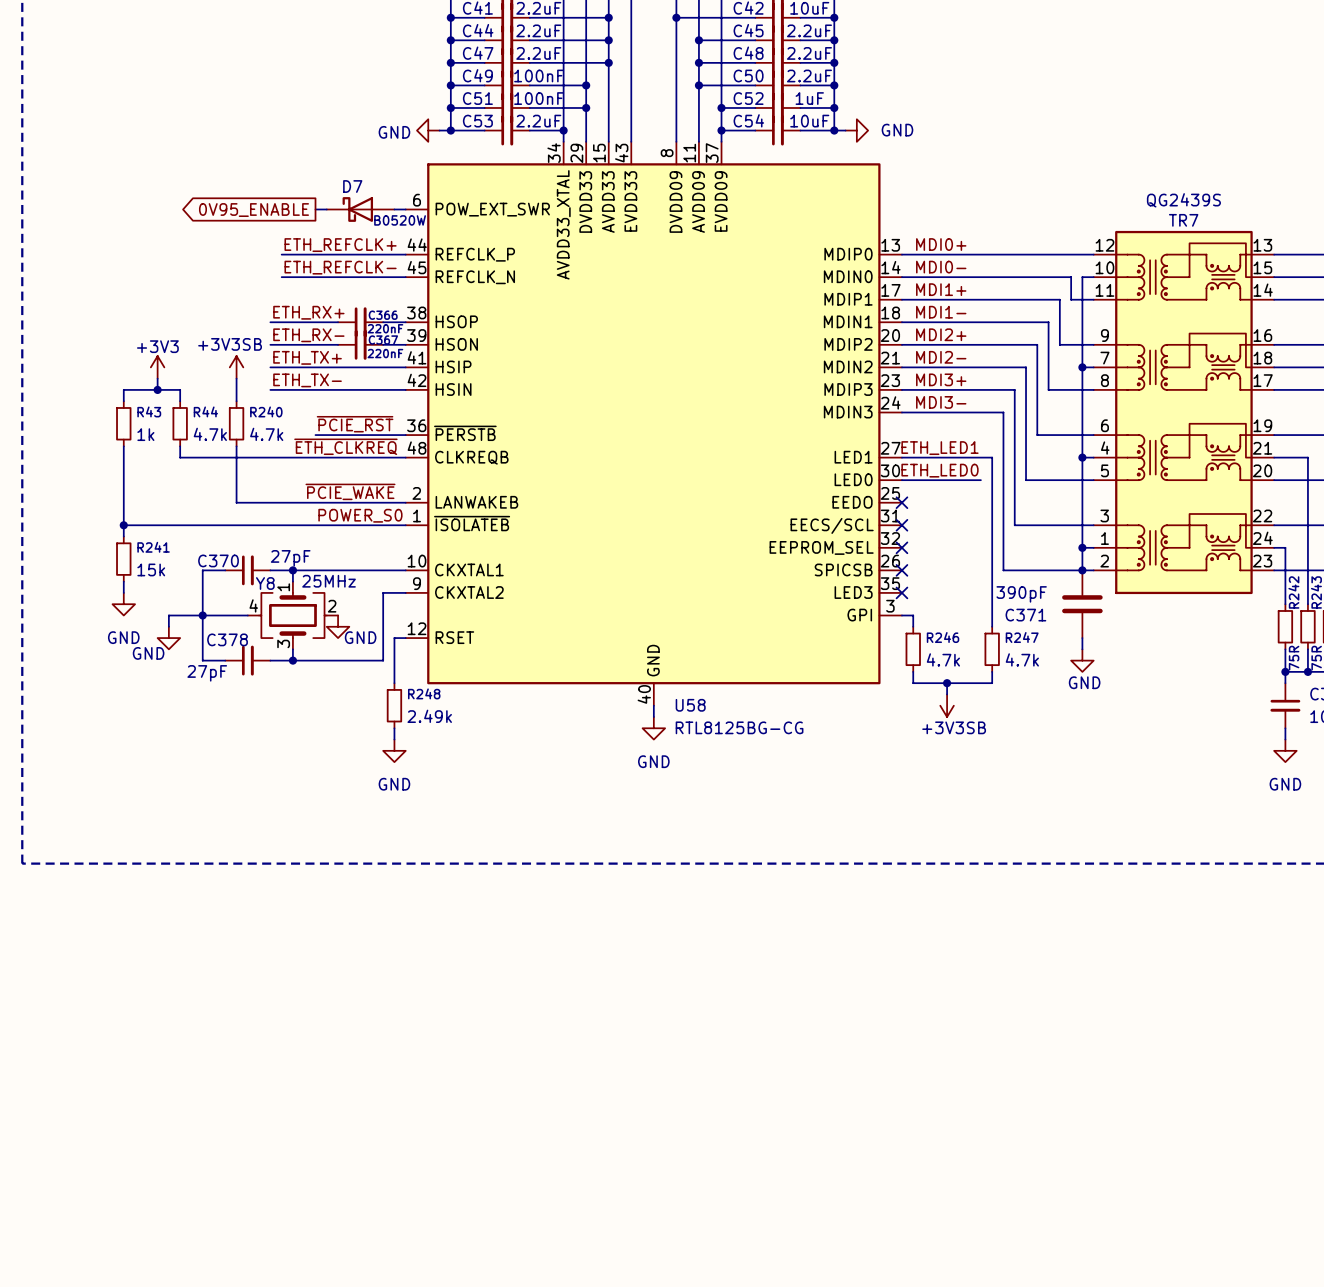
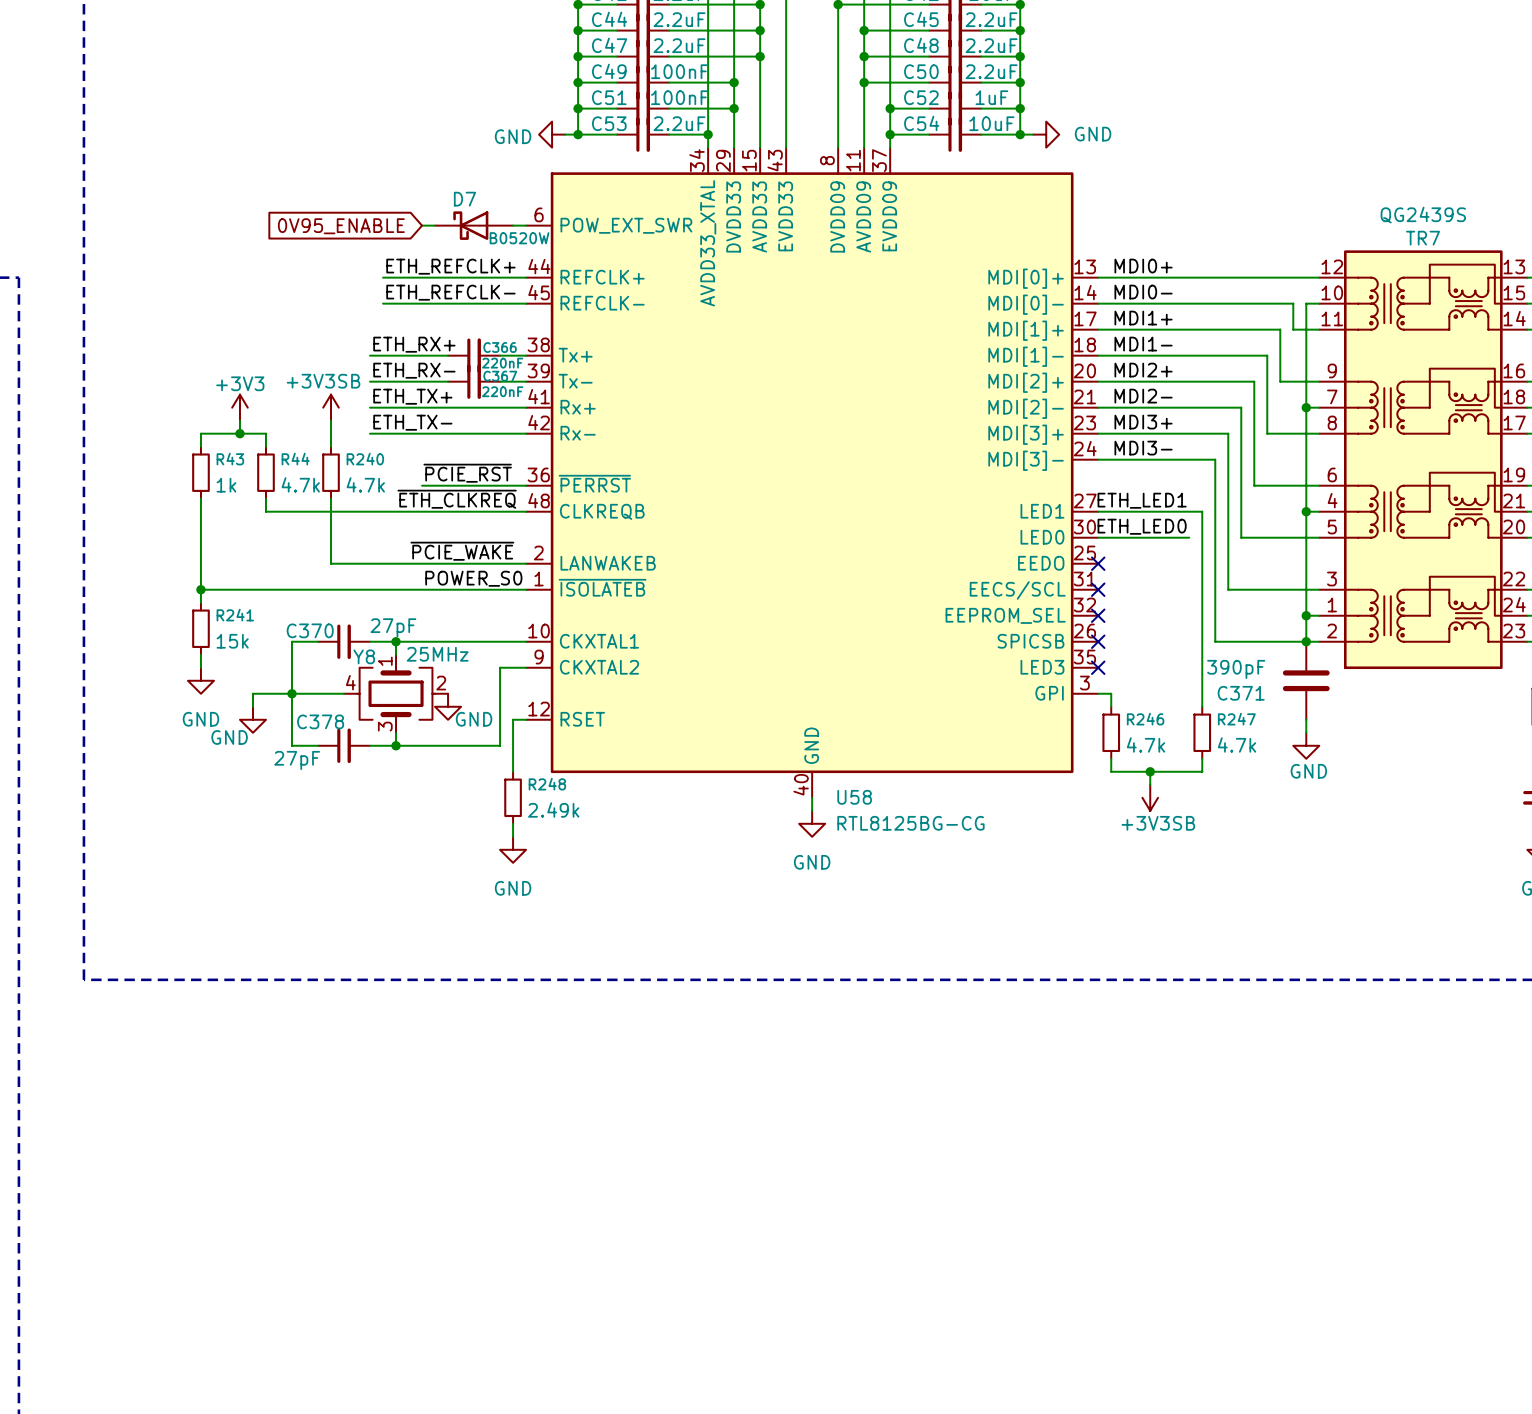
U58 symbol: [405, 141, 902, 706] -> [526, 147, 1099, 798]
global label shape: output (253, 210) -> input (341, 226)

